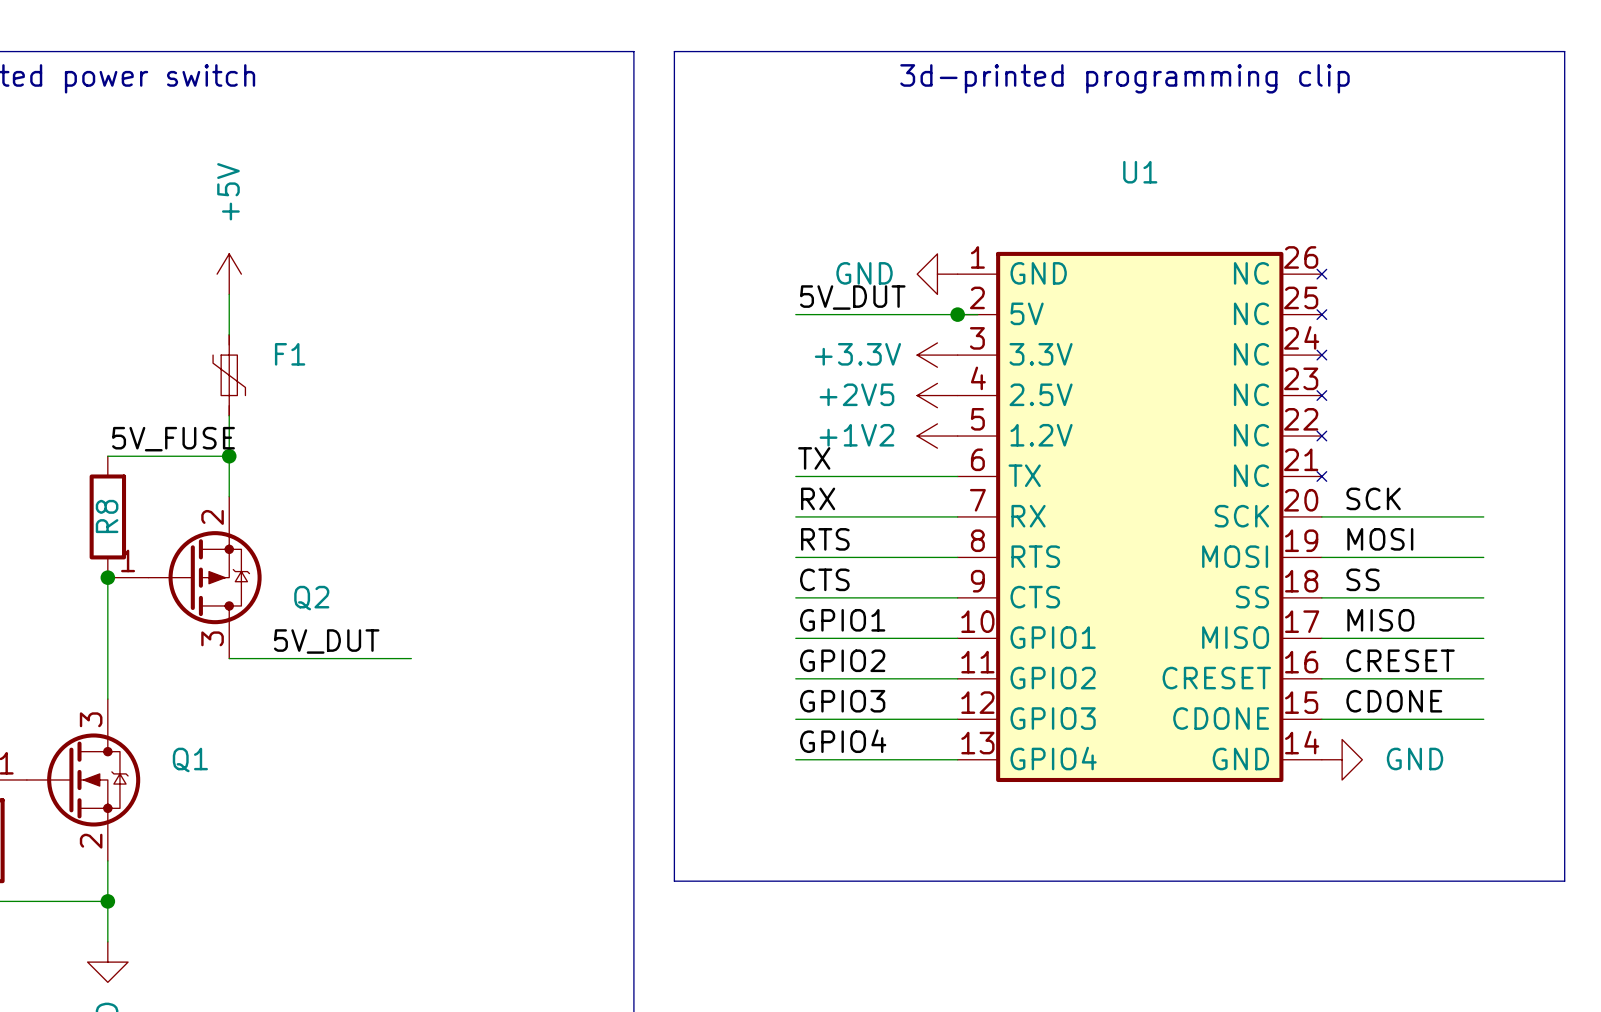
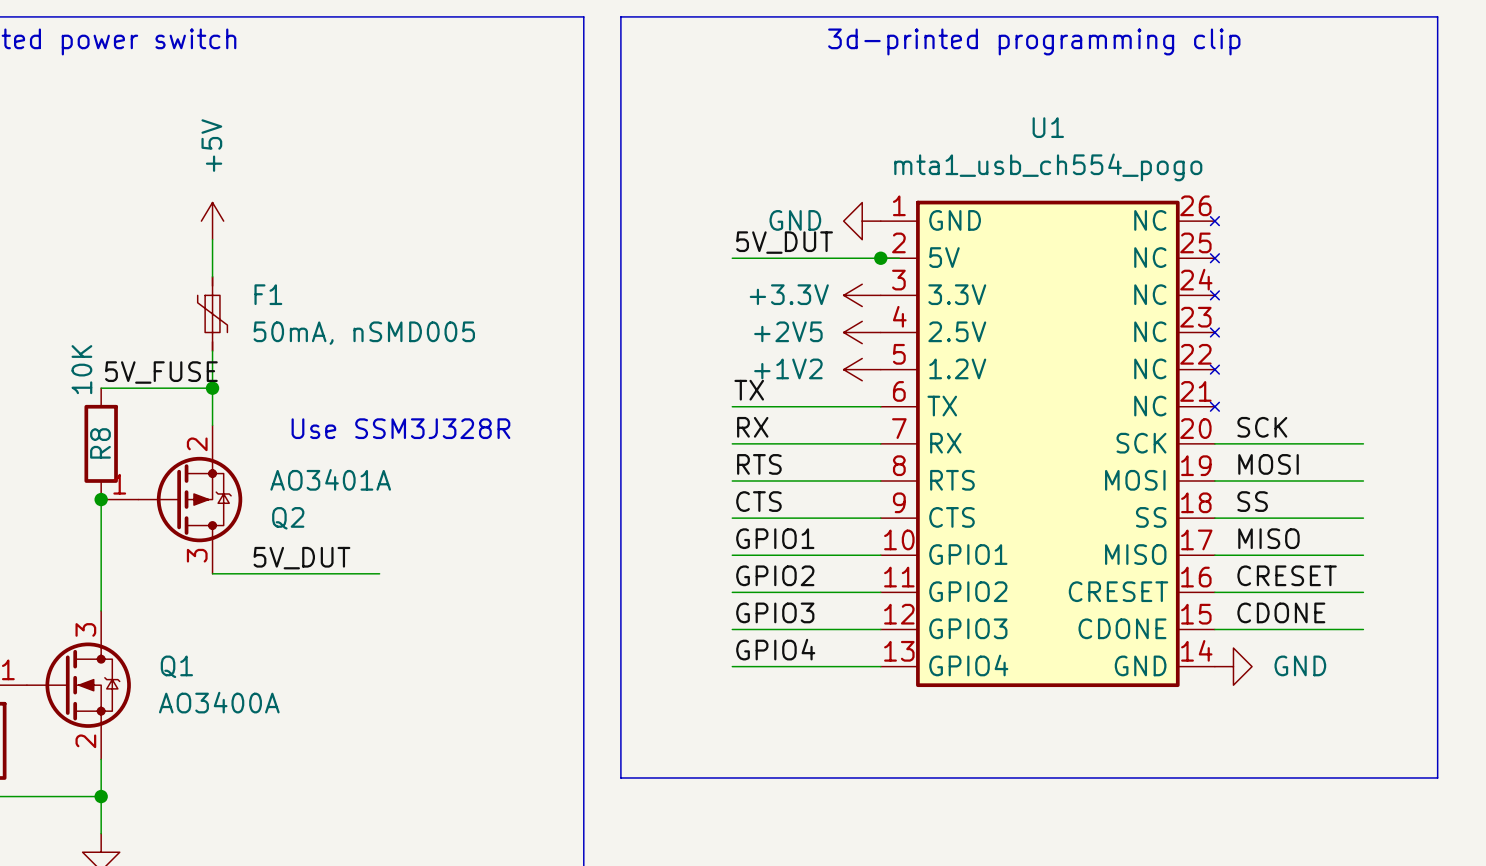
U1 value: none -> mta1_usb_ch554_pogo (1048, 167)
F1 value: none -> 50mA, nSMD005 (364, 333)
R8 value: none -> 10K (81, 369)
text: none -> Use SSM3J328R (400, 428)
Q2 value: none -> AO3401A (330, 479)
Q1 value: none -> AO3400A (219, 702)

